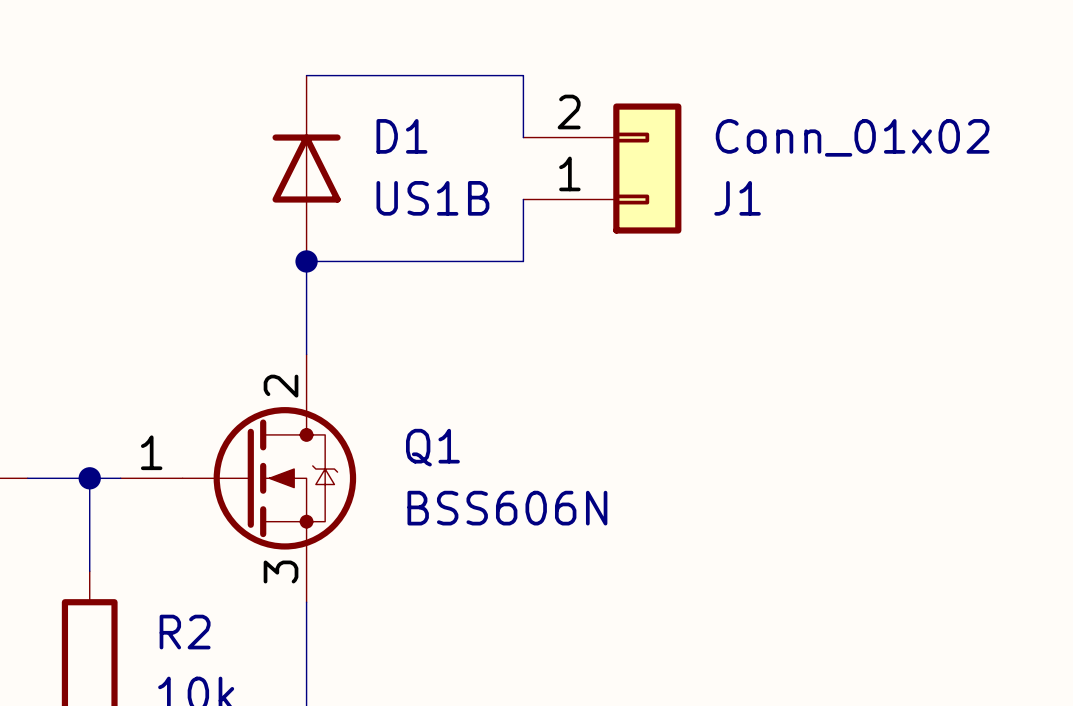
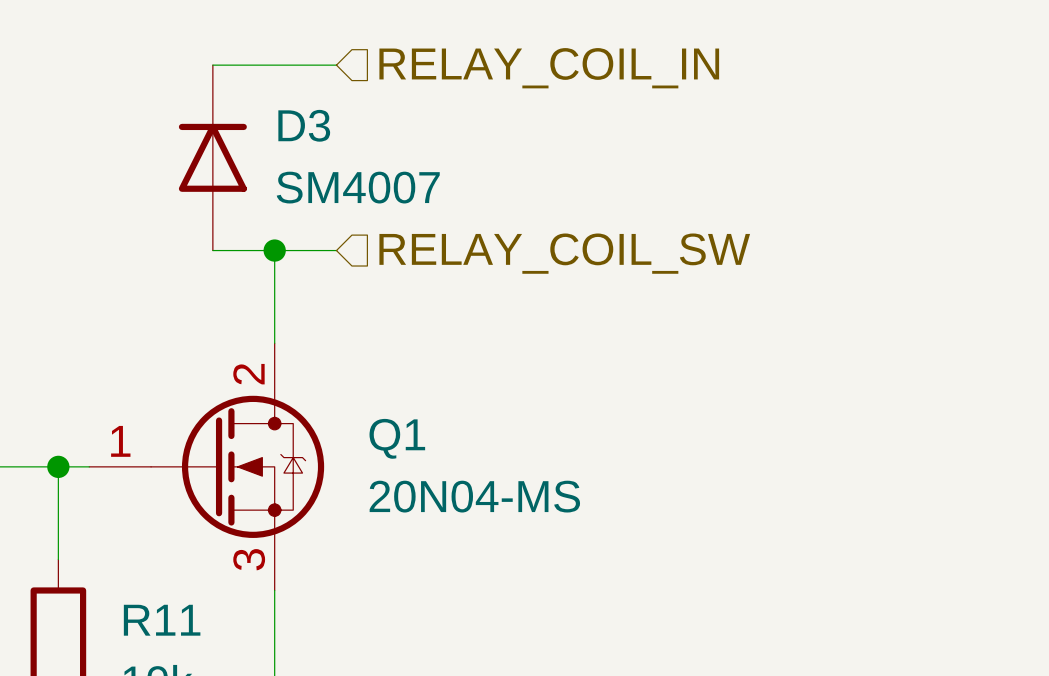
wire: none -> (212, 65) (274, 65)
wire: (368, 75) (523, 75) (523, 137) -> none
hierarchical label: none -> RELAY_COIL_IN (549, 68)
D3: none -> SM4007 (212, 157)
D1: US1B (306, 168) -> none
J1: Conn_01x02 (602, 168) -> none
wire: (523, 199) (523, 261) (368, 261) -> none
wire: none -> (212, 250) (274, 250)
hierarchical label: none -> RELAY_COIL_SW (564, 253)
Q1 value: BSS606N (507, 508) -> 20N04-MS (474, 496)
R2 name: R2 (185, 632) -> R11 (162, 620)

